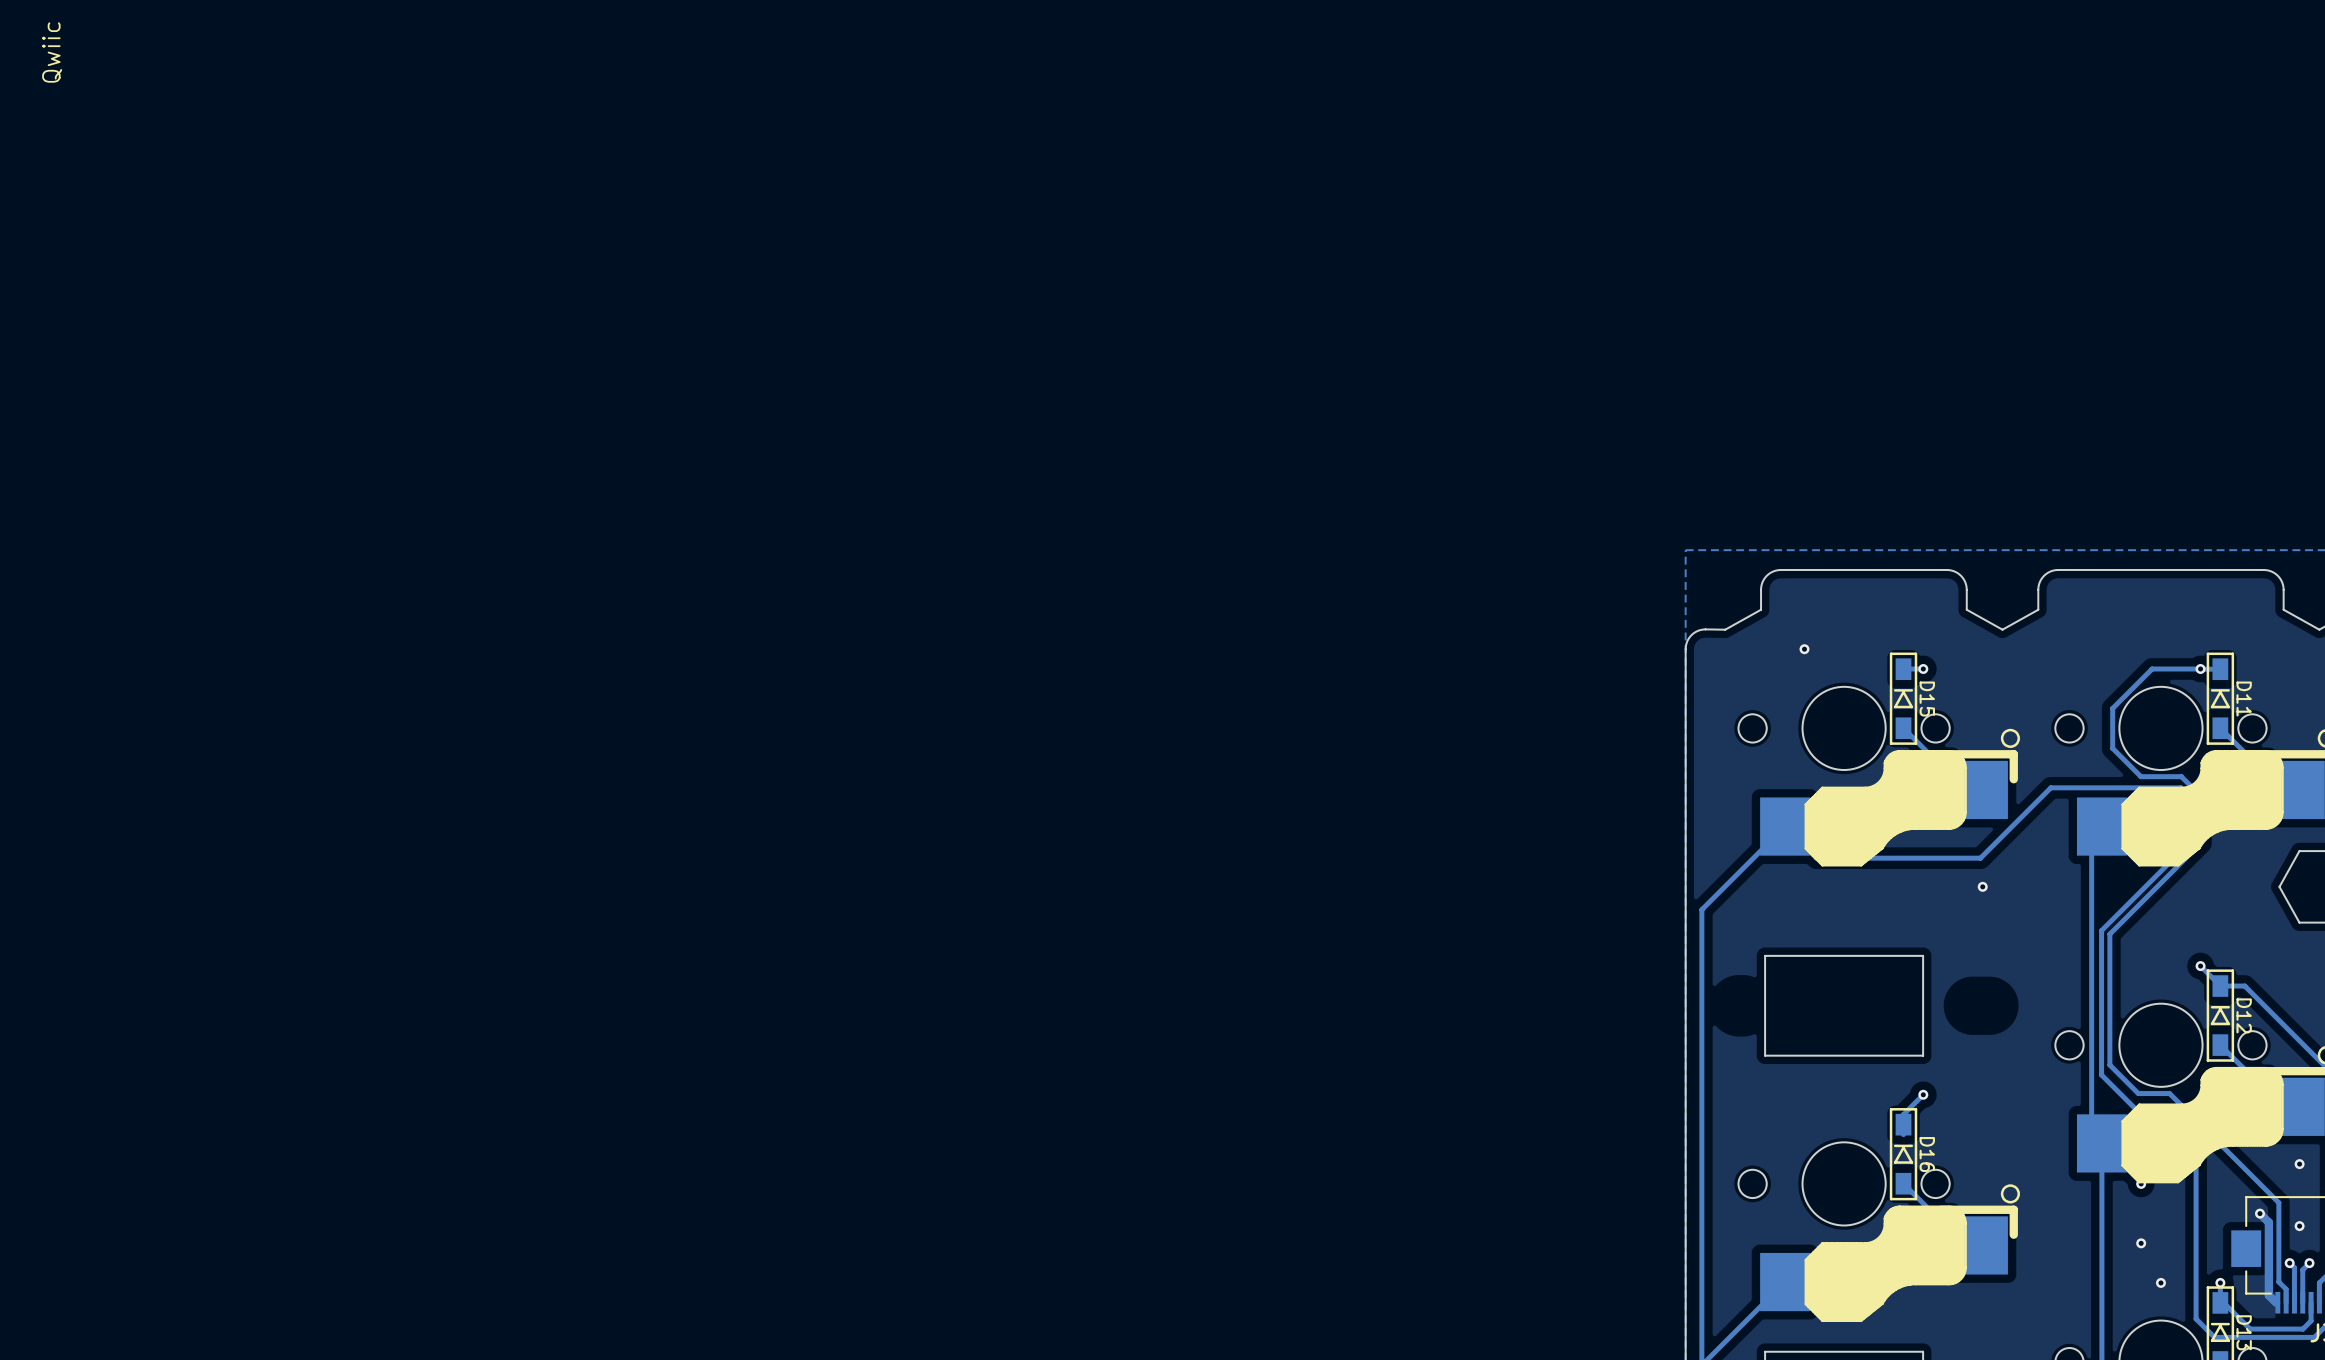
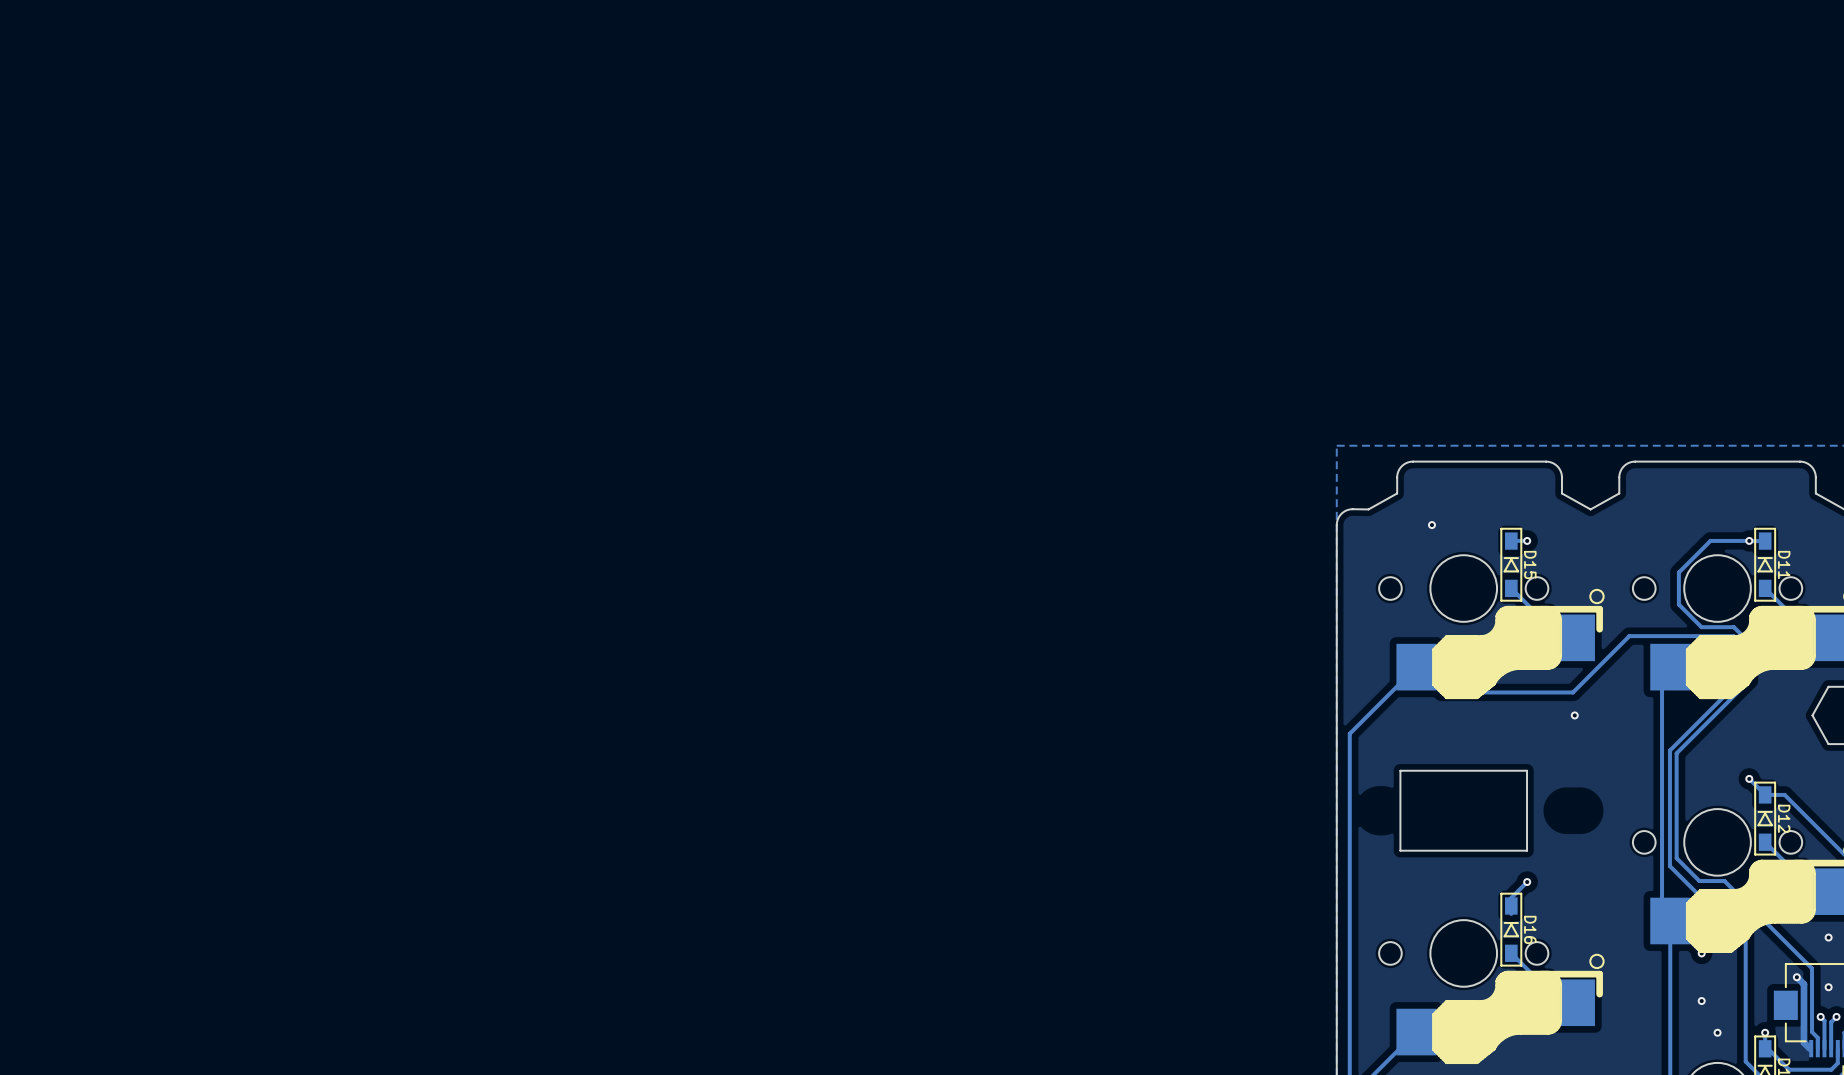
text: Qwiic (52, 52) -> none

